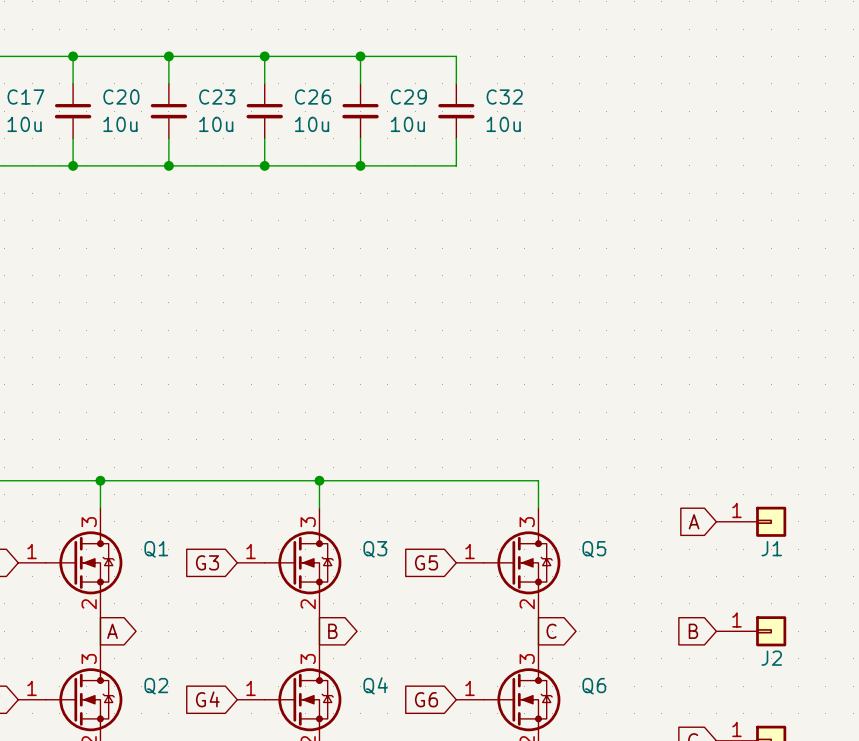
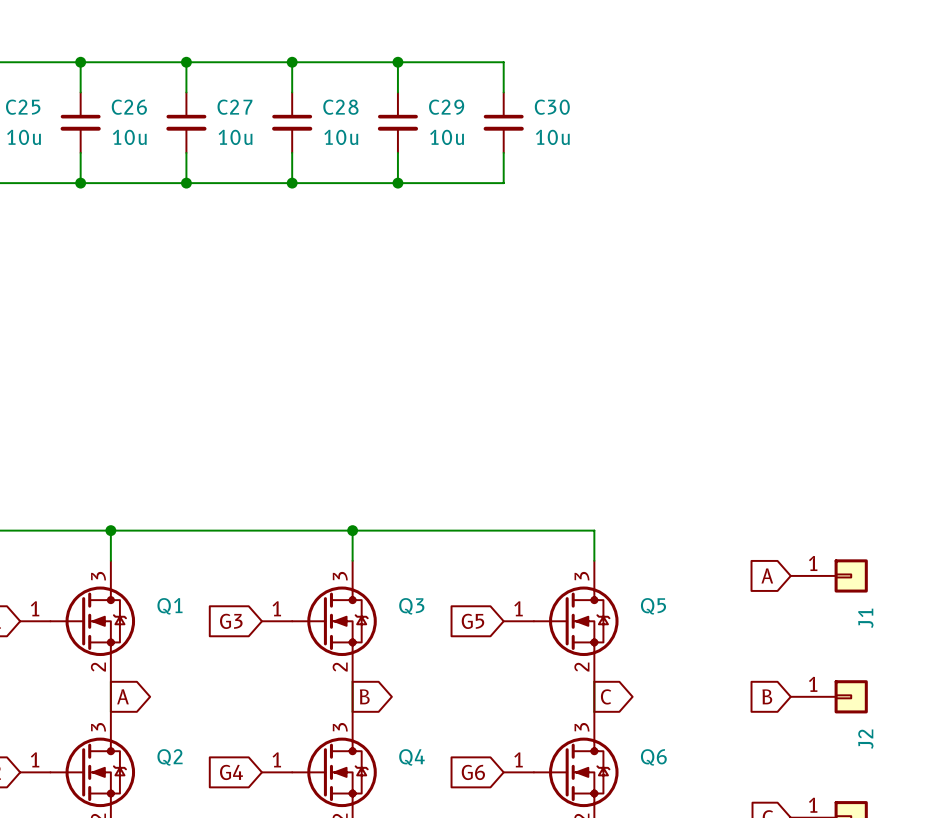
C17 name: C17 (25, 97) -> C25 (23, 107)
C20 name: C20 (121, 97) -> C26 (129, 107)
C23 name: C23 (217, 97) -> C27 (234, 107)
C26 name: C26 (313, 97) -> C28 (340, 107)
C32 name: C32 (504, 97) -> C30 (552, 107)
J1 name rotation: 0° (771, 548) -> 90° counterclockwise (865, 618)
J2 name rotation: 0° (771, 658) -> 90° counterclockwise (865, 739)

